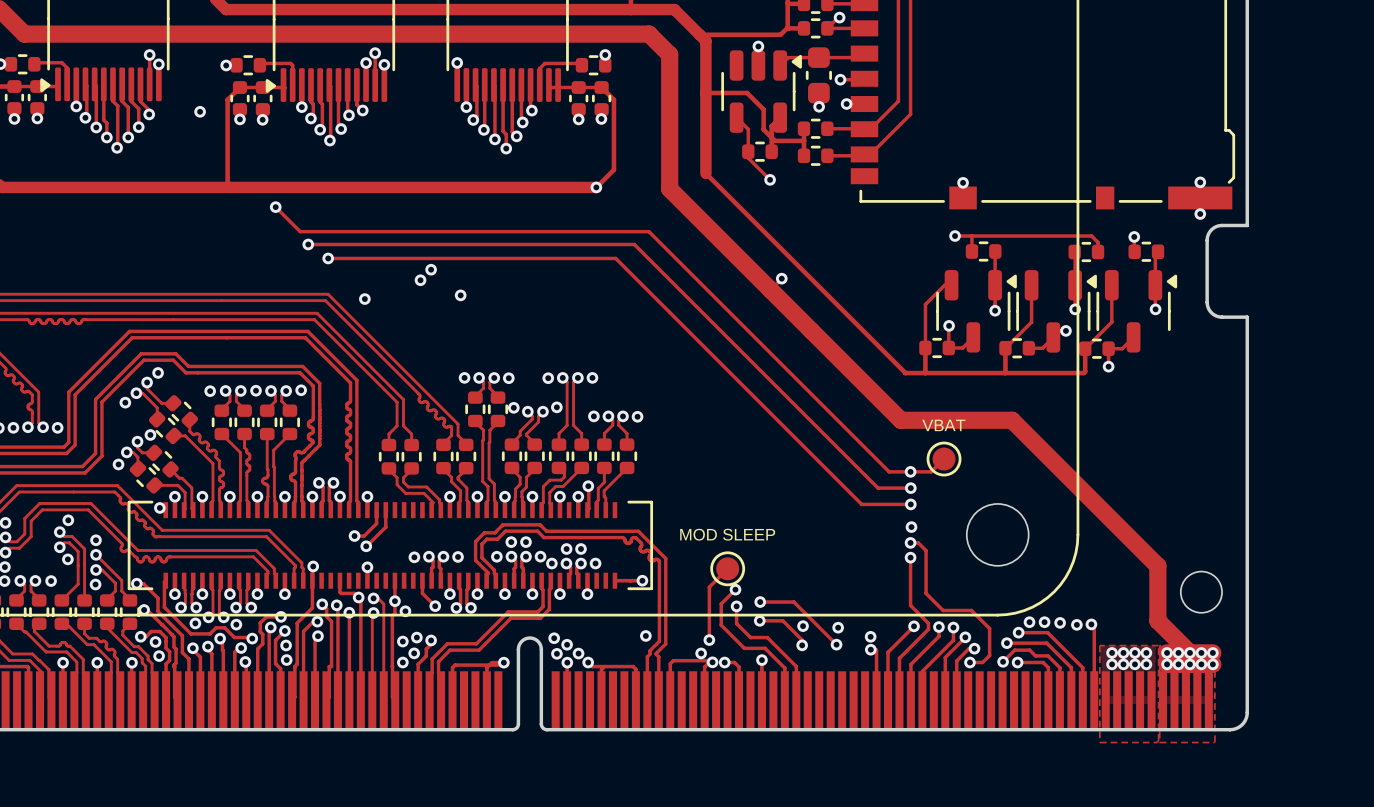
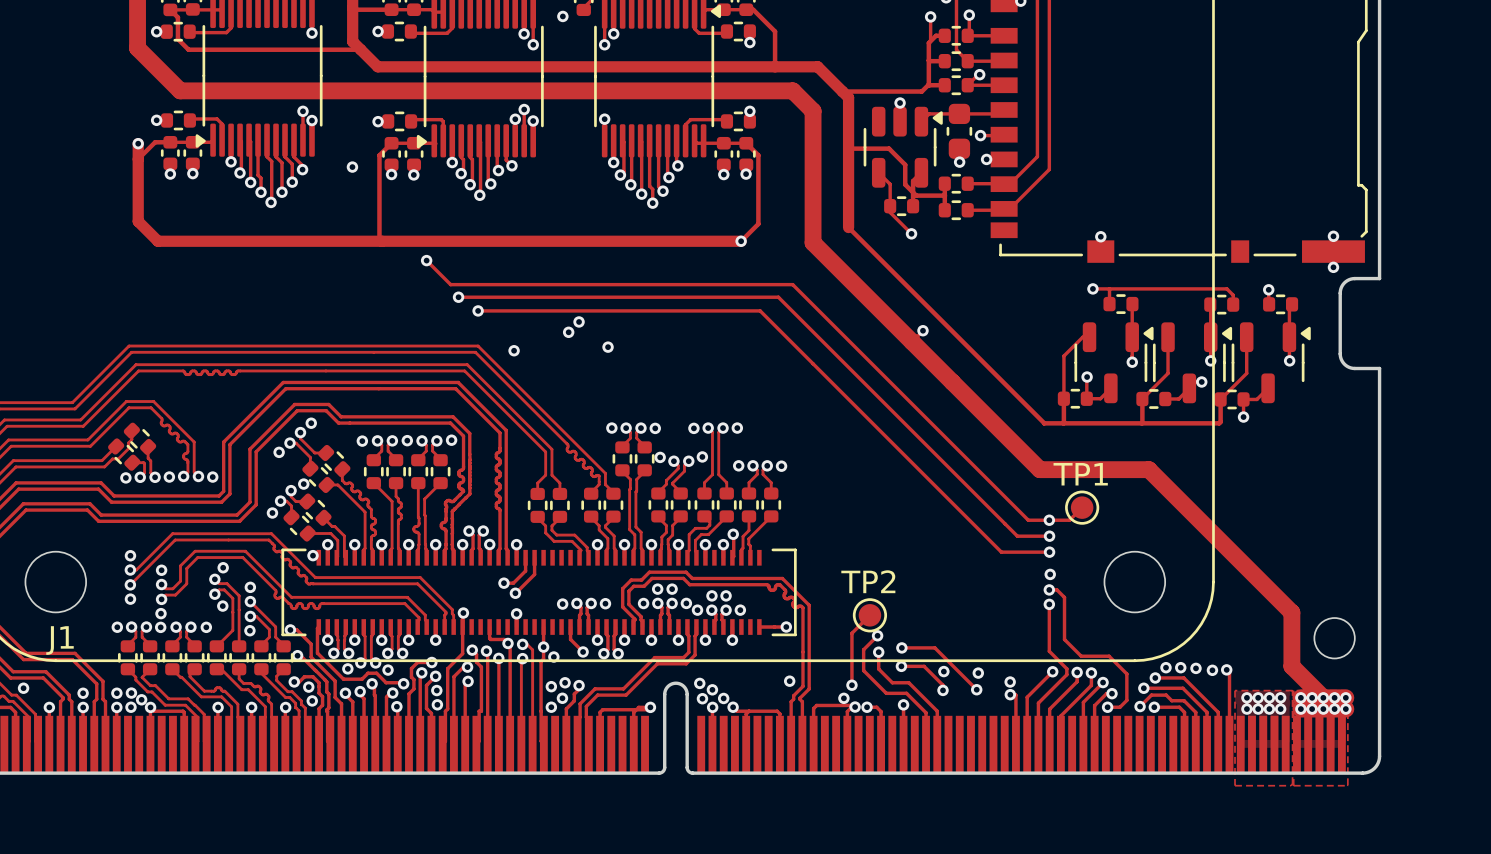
VBAT name: VBAT (943, 425) -> TP1 (1080, 474)
MOD SLEEP name: MOD SLEEP (727, 534) -> TP2 (868, 581)

